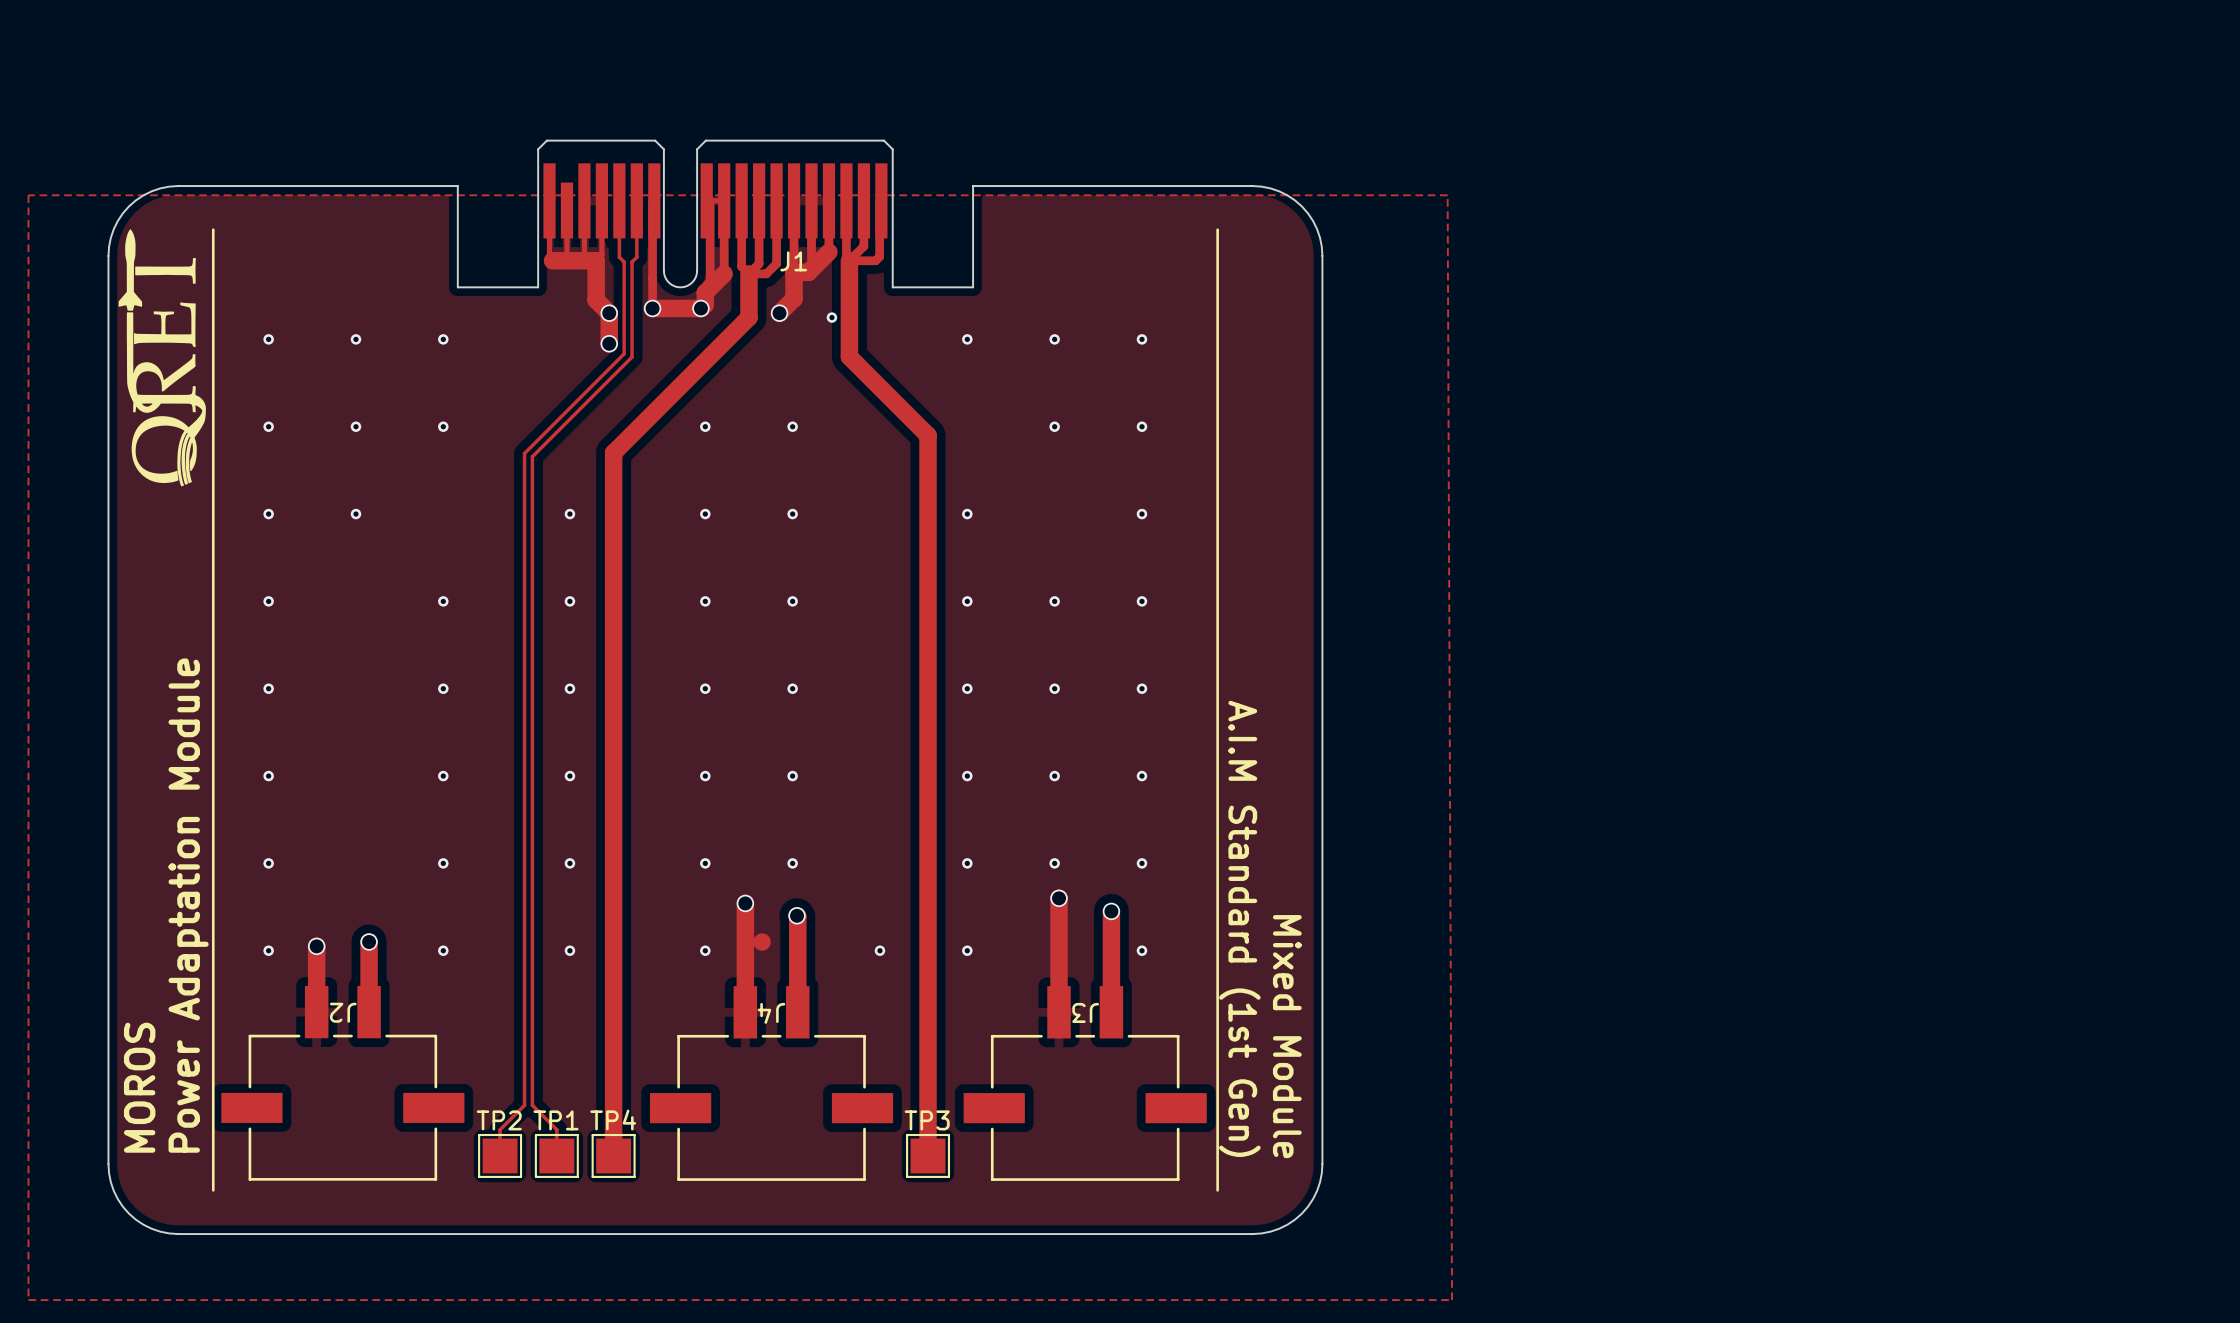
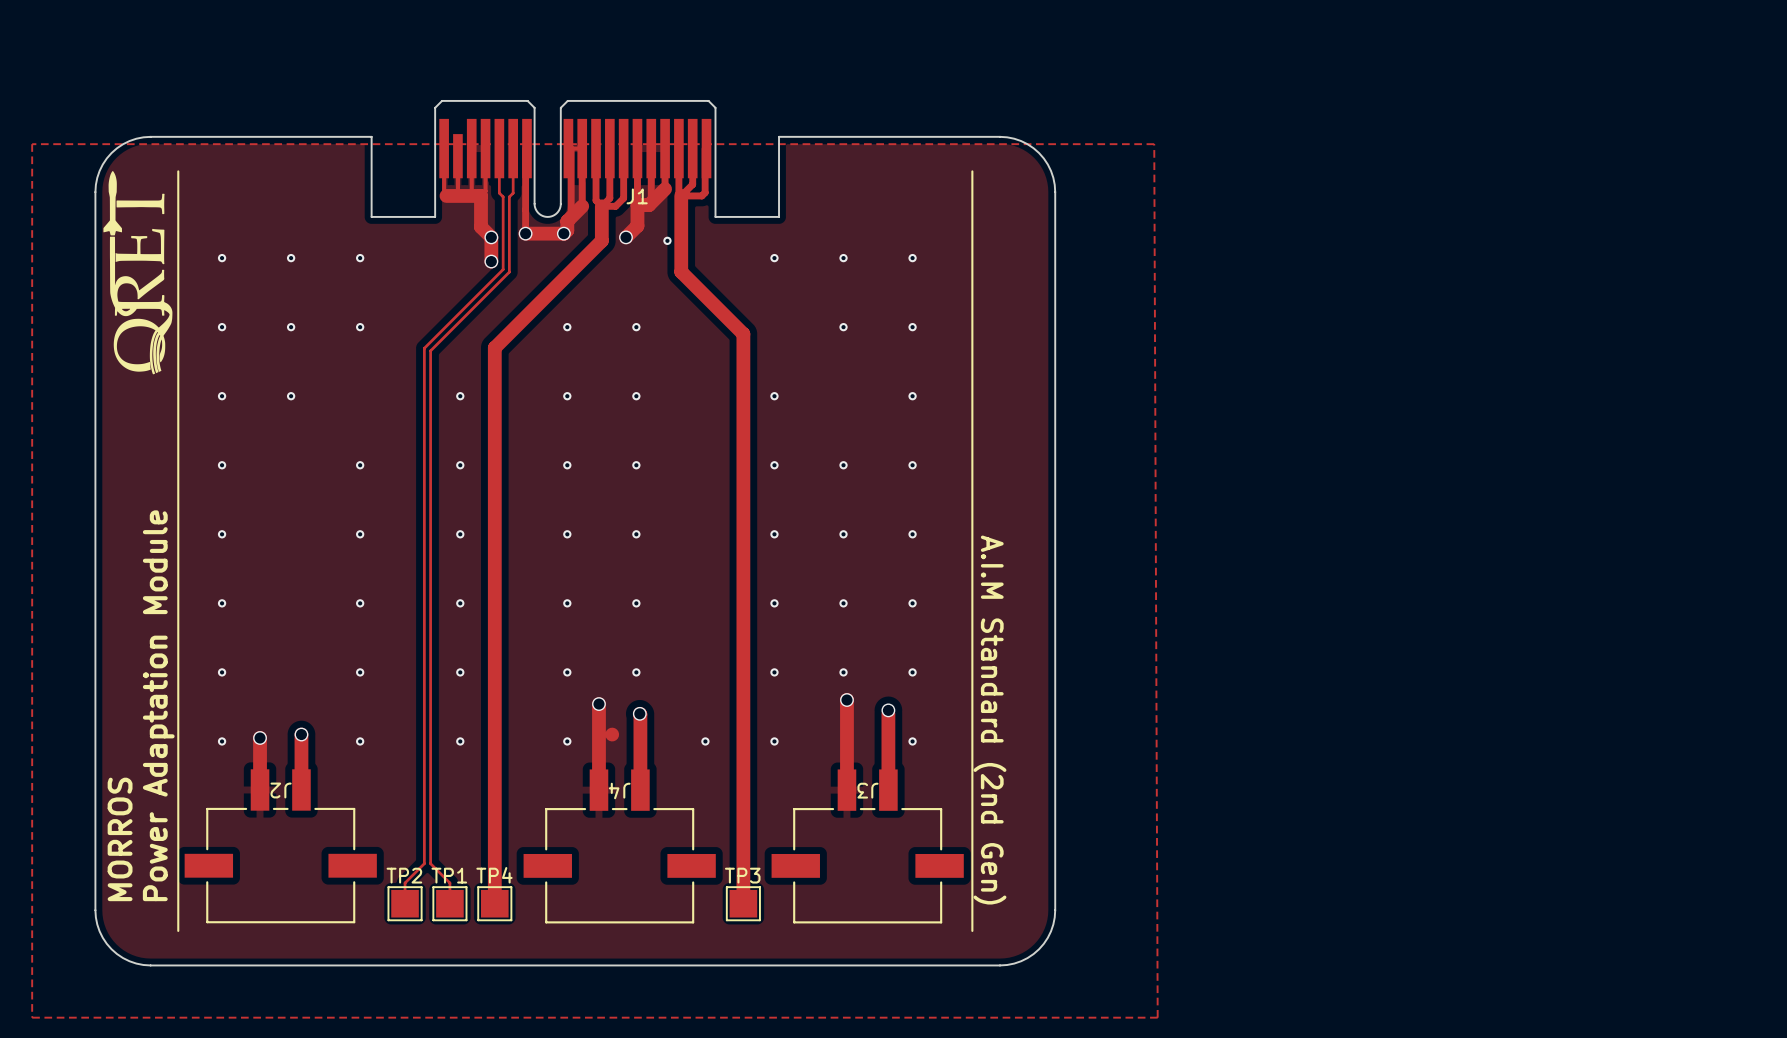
text: A.I.M Standard (1st Gen) (1239, 928) -> A.I.M Standard (2nd Gen) (989, 720)
text: Mixed Module (1287, 1036) -> none
text: MOROS (139, 1087) -> MORROS (120, 839)

